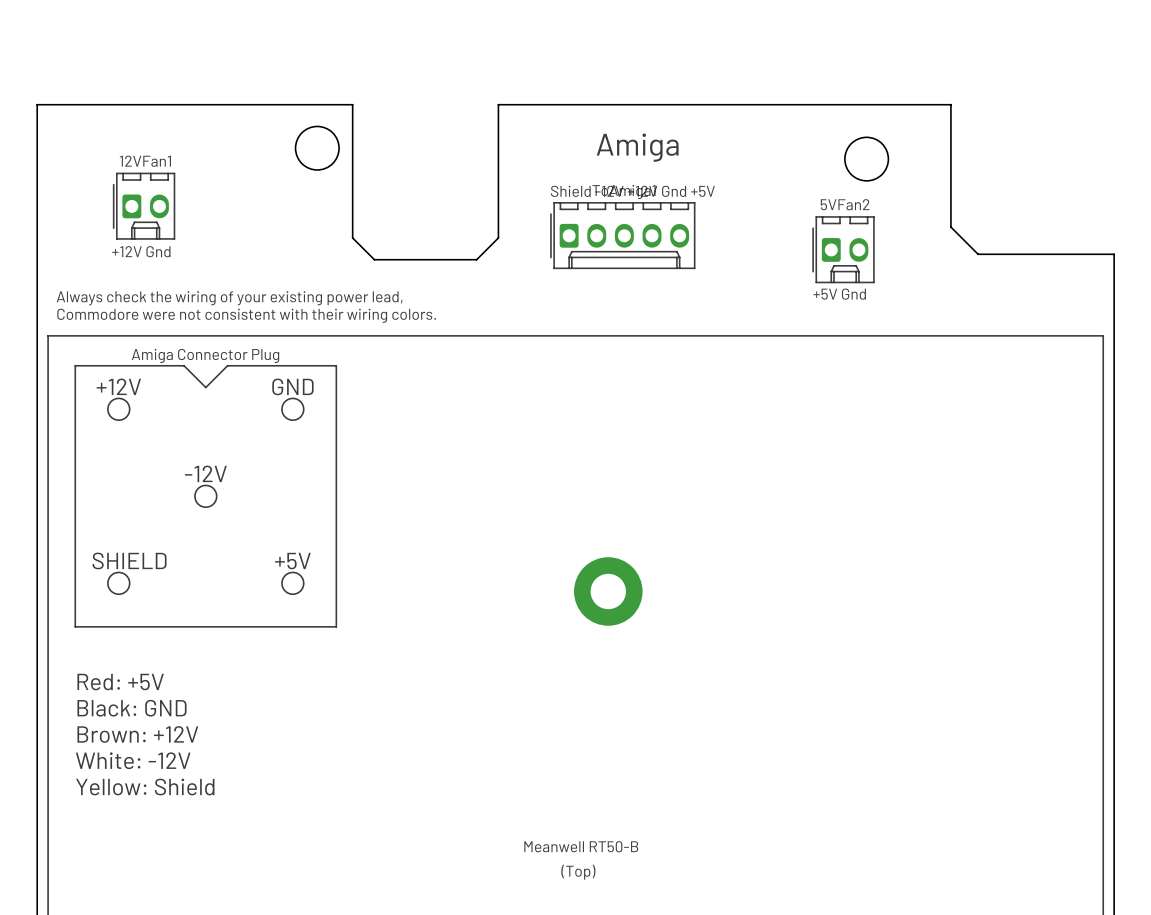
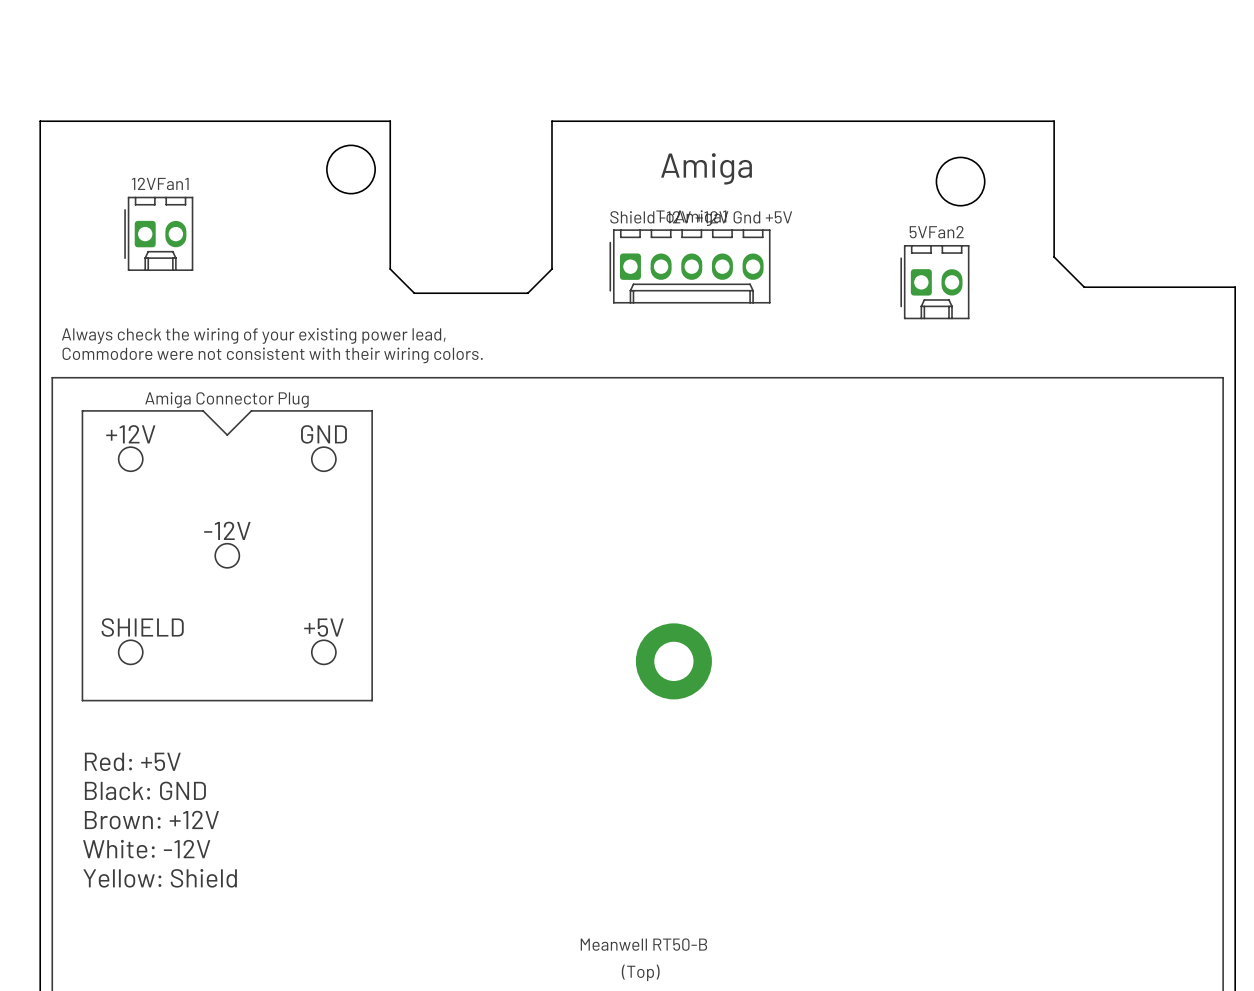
text: +12V Gnd (141, 251) -> none
text: +5V Gnd (839, 294) -> none

